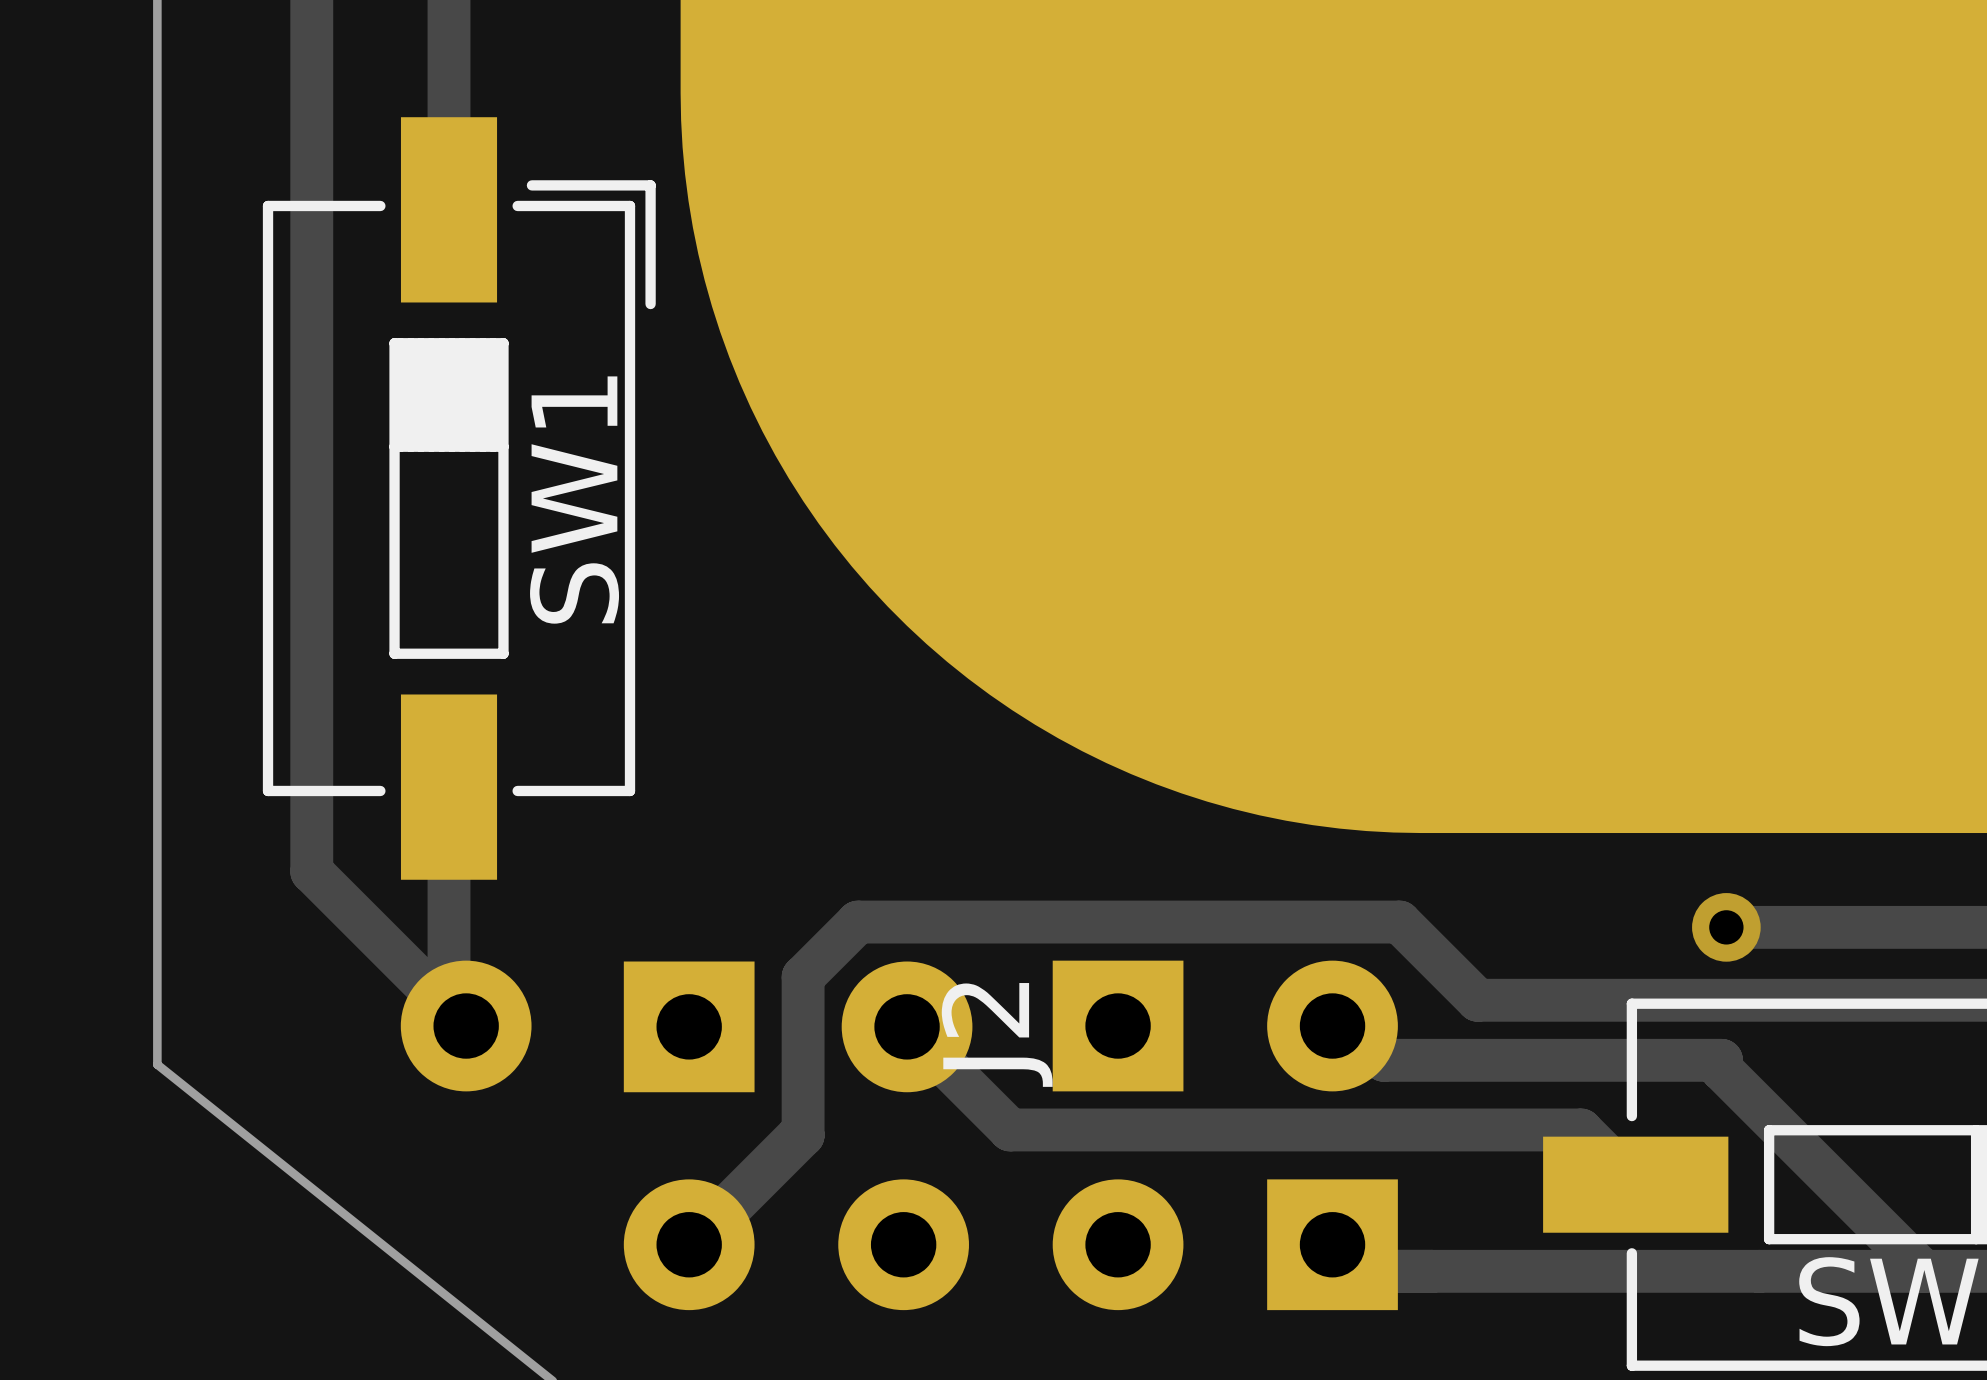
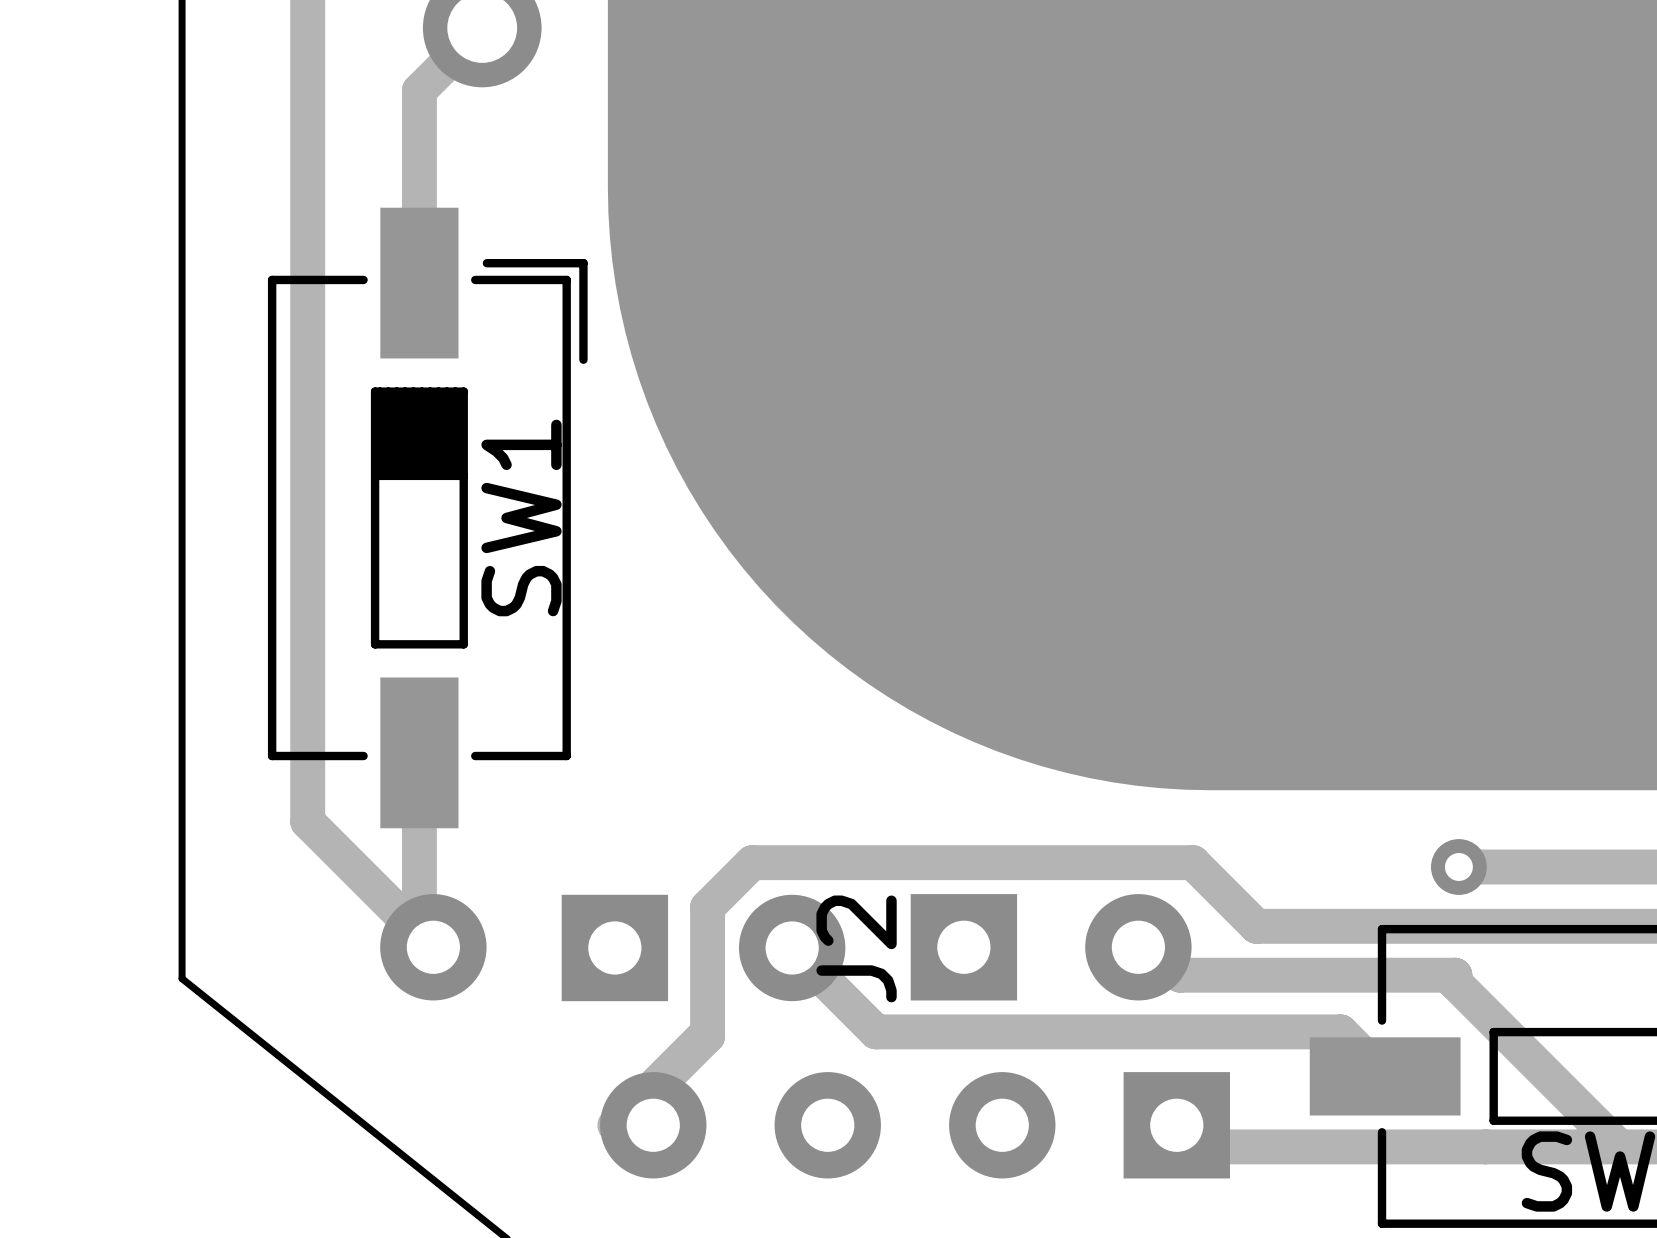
part position: (1010, 1244) -> (915, 1125)

